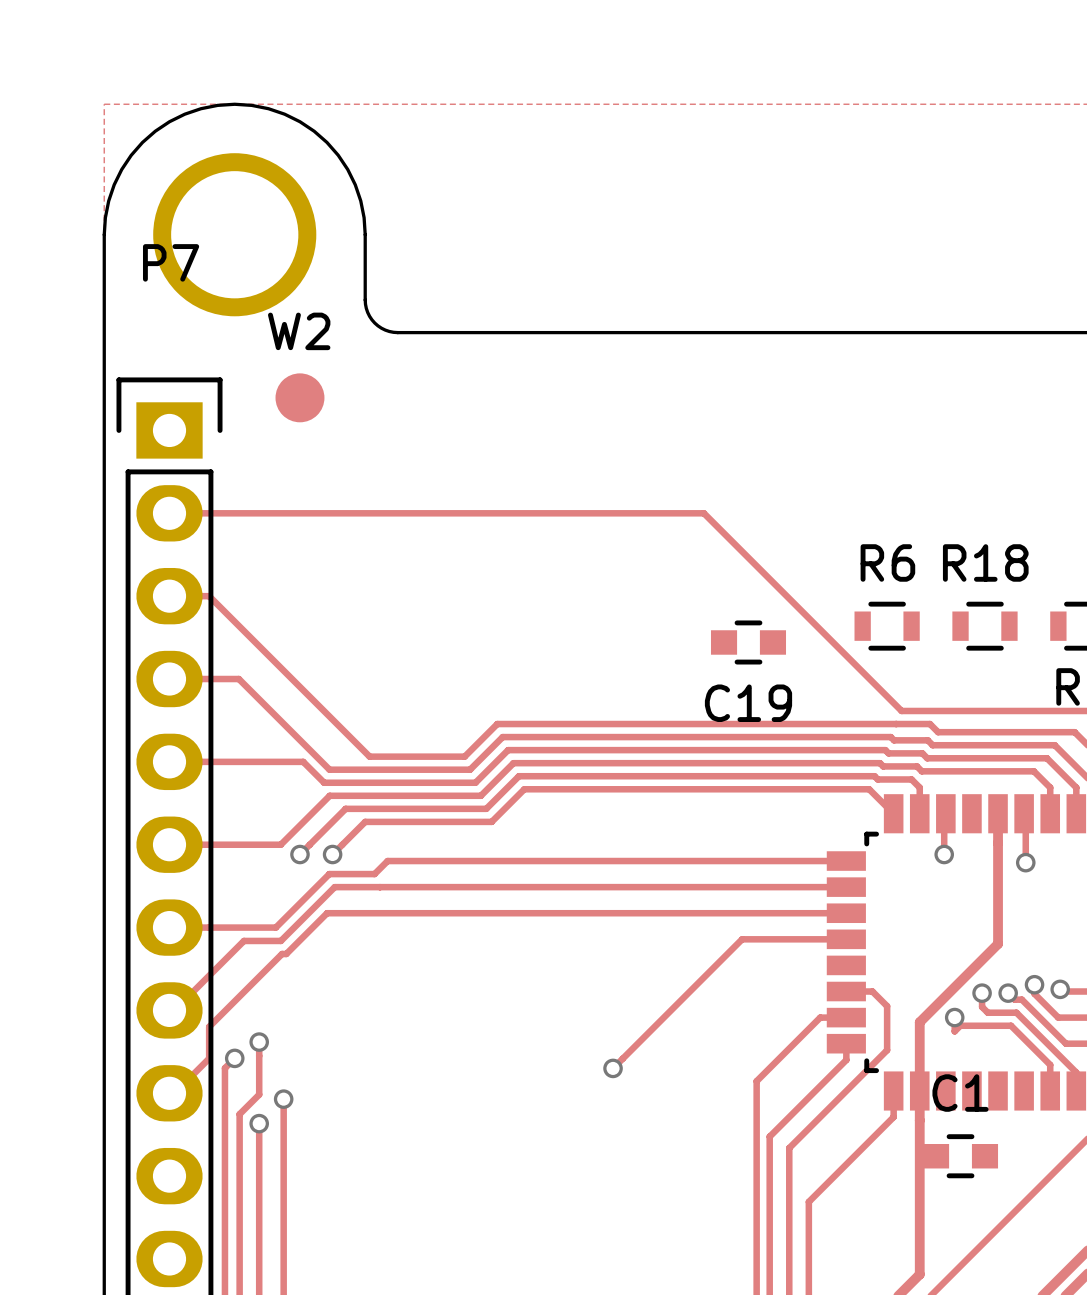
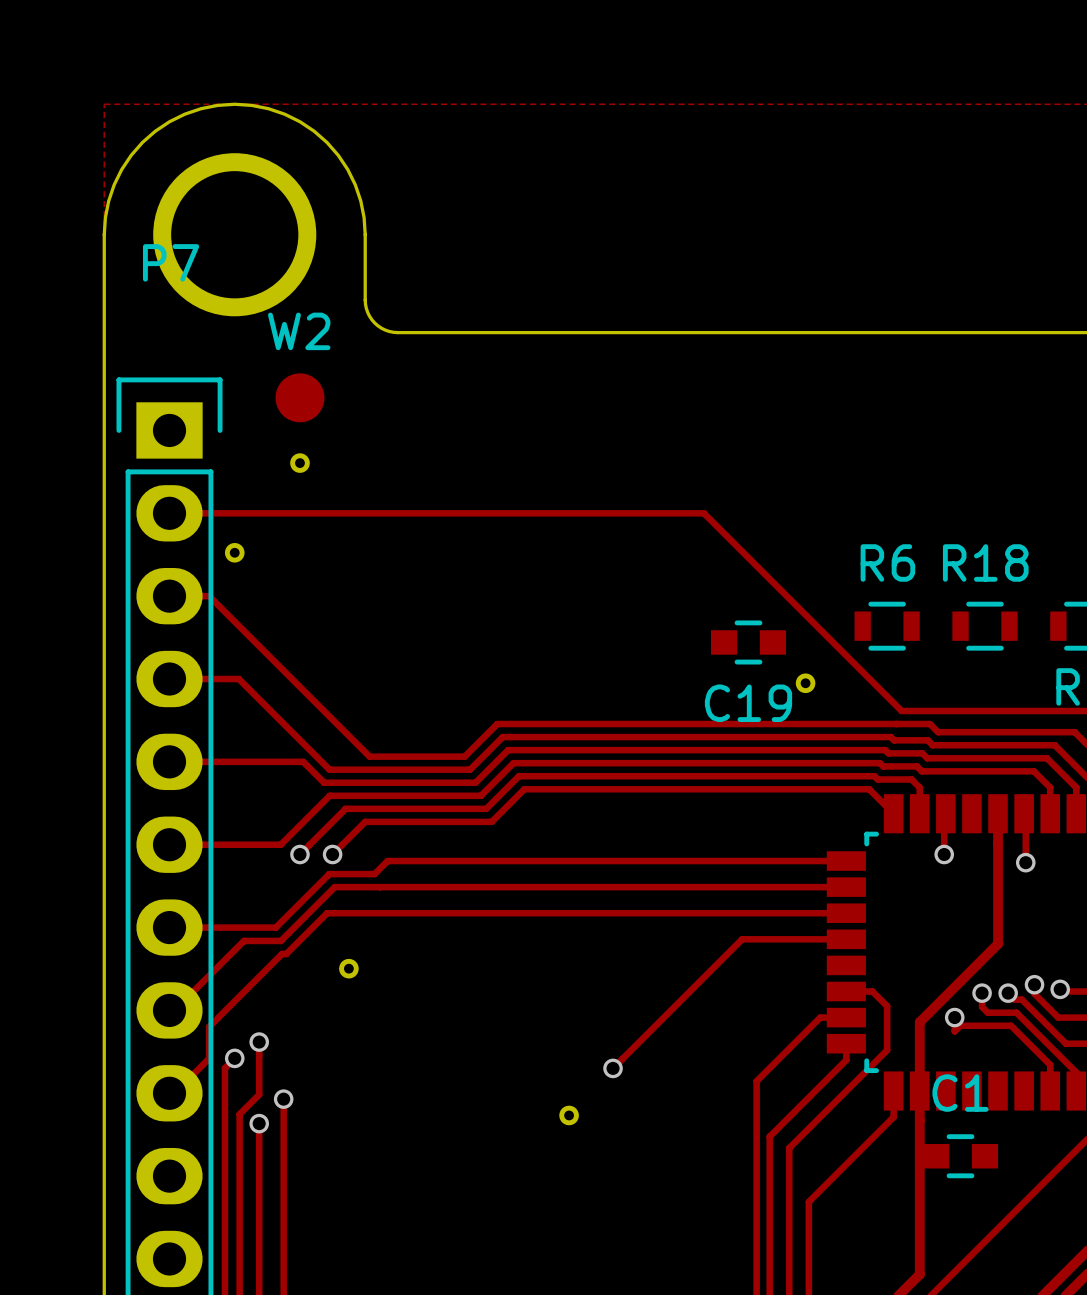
part: none -> (299, 463)
part: none -> (234, 552)
part: none -> (805, 683)
part: none -> (348, 968)
part: none -> (569, 1115)

